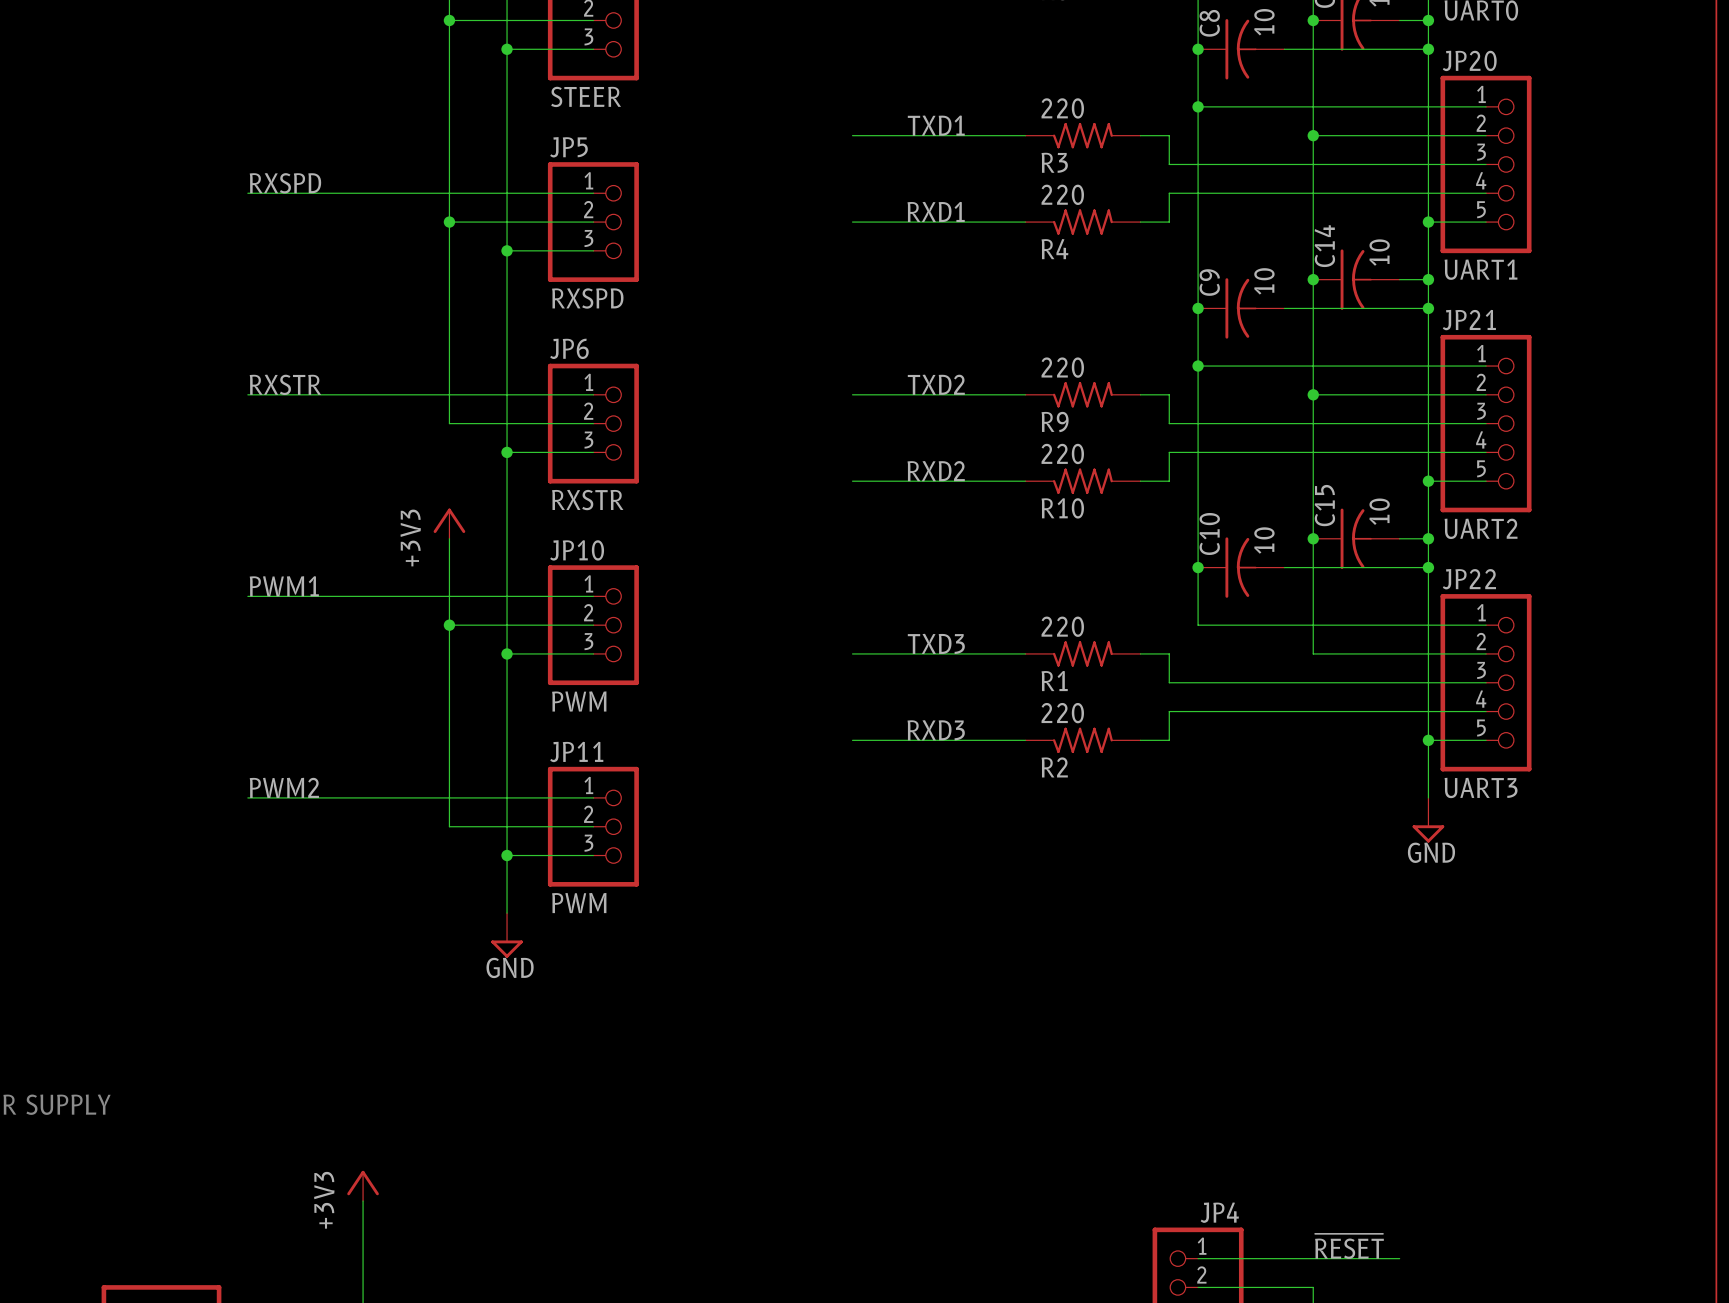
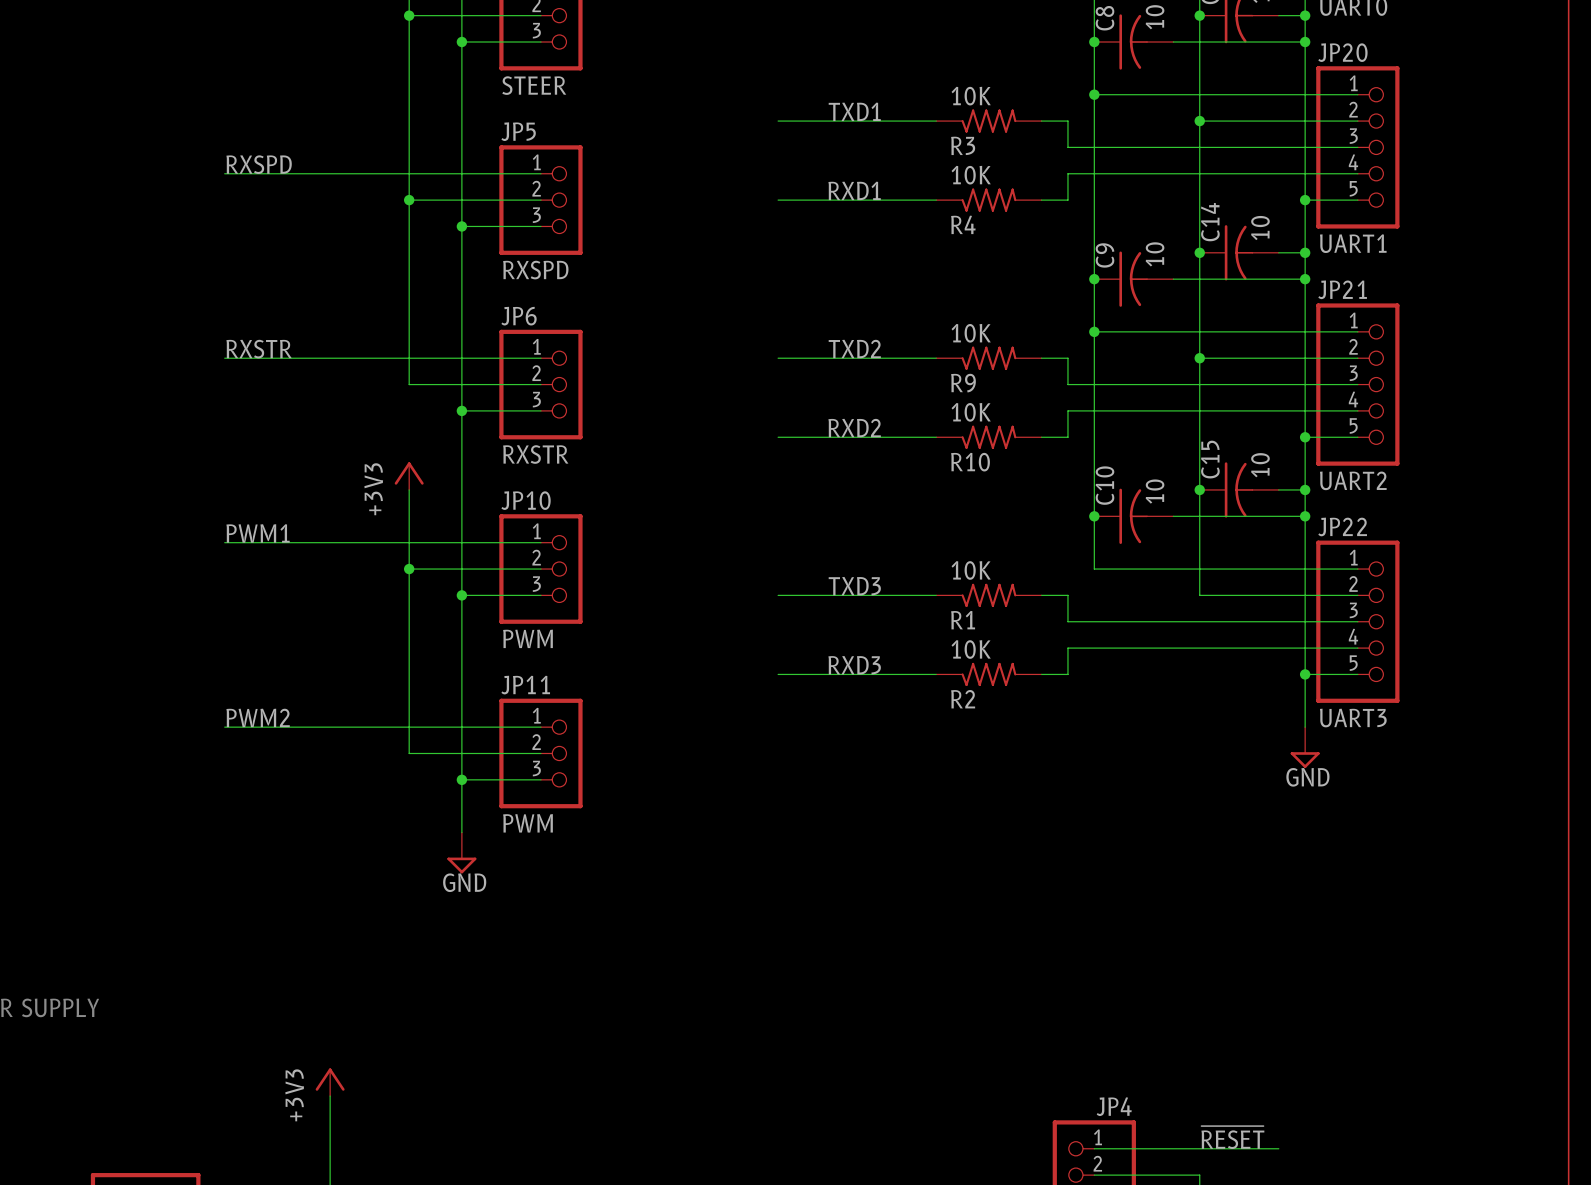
R3 value: 220 (1062, 108) -> 10K (971, 96)
R4 value: 220 (1062, 194) -> 10K (971, 175)
R9 value: 220 (1062, 367) -> 10K (971, 333)
R10 value: 220 (1062, 453) -> 10K (971, 412)
R1 value: 220 (1062, 626) -> 10K (971, 570)
R2 value: 220 (1062, 713) -> 10K (971, 649)

